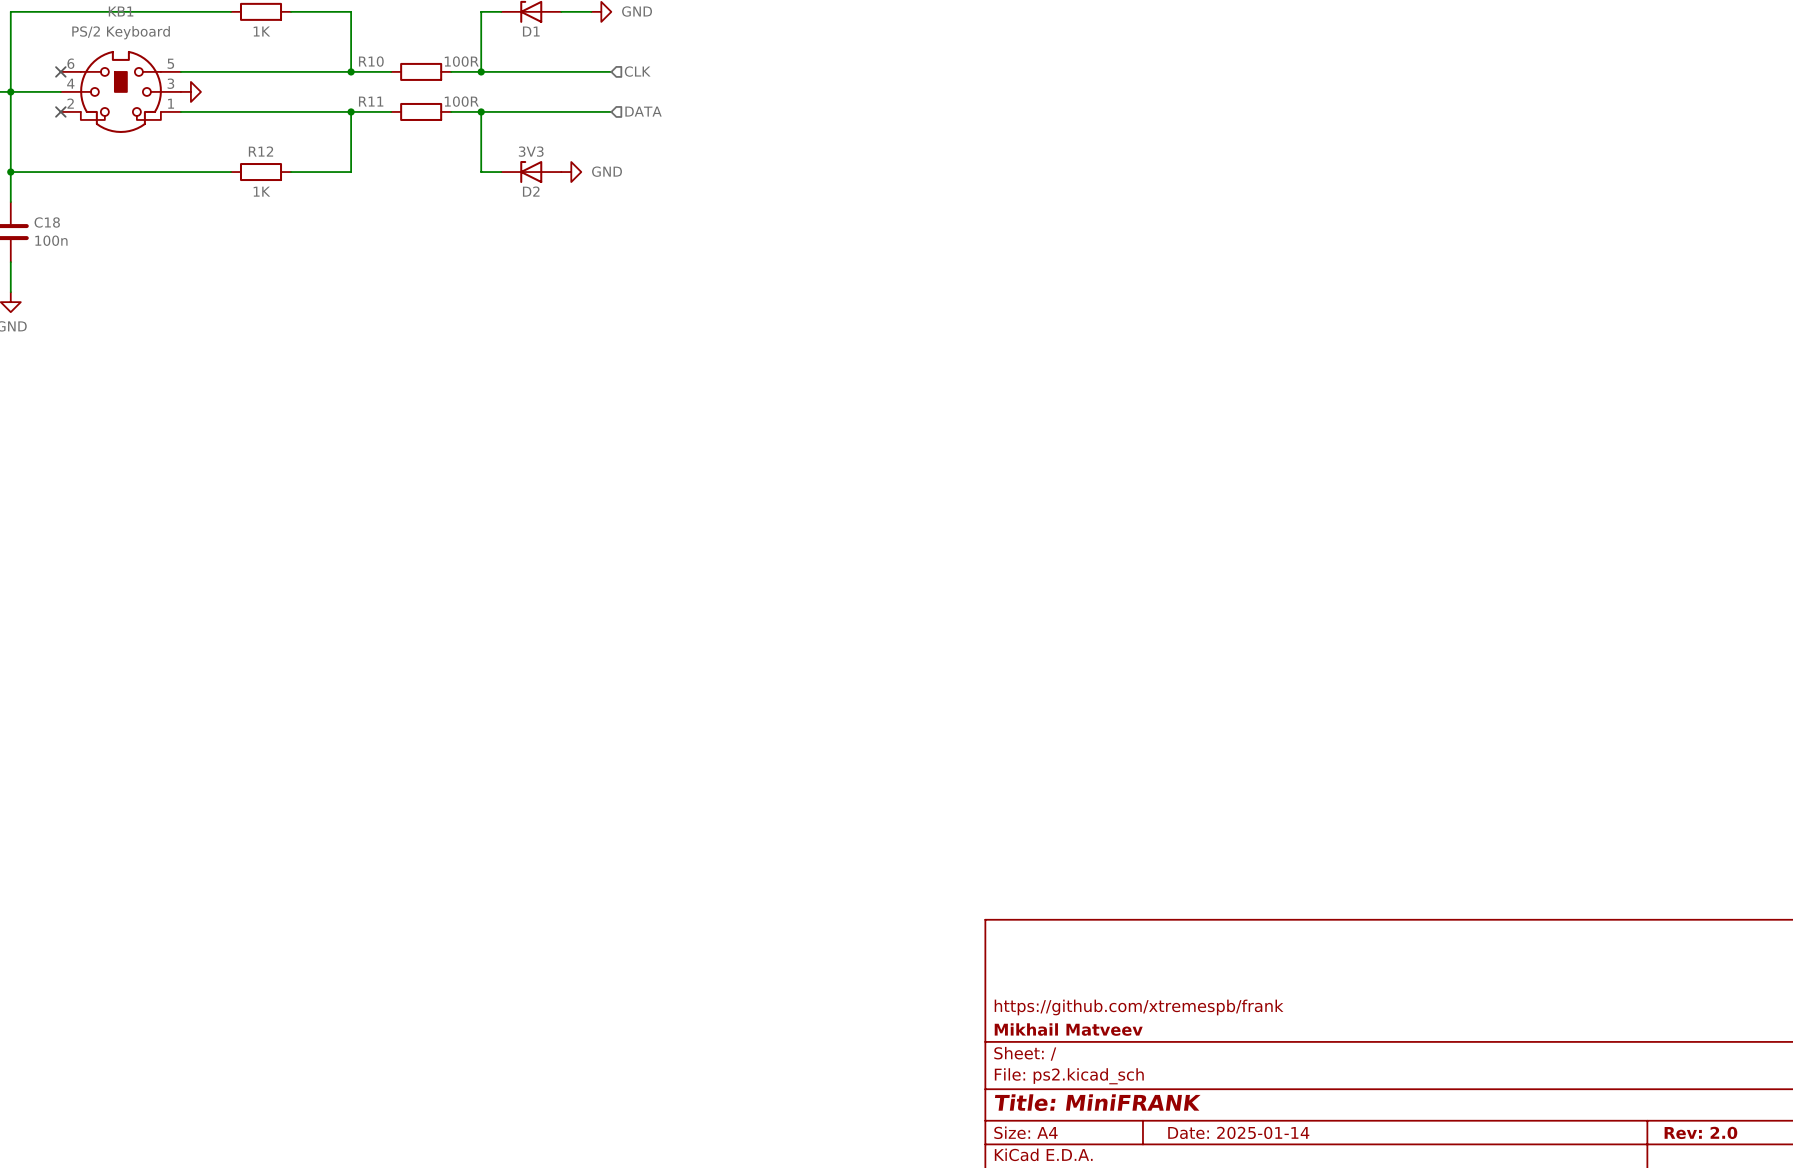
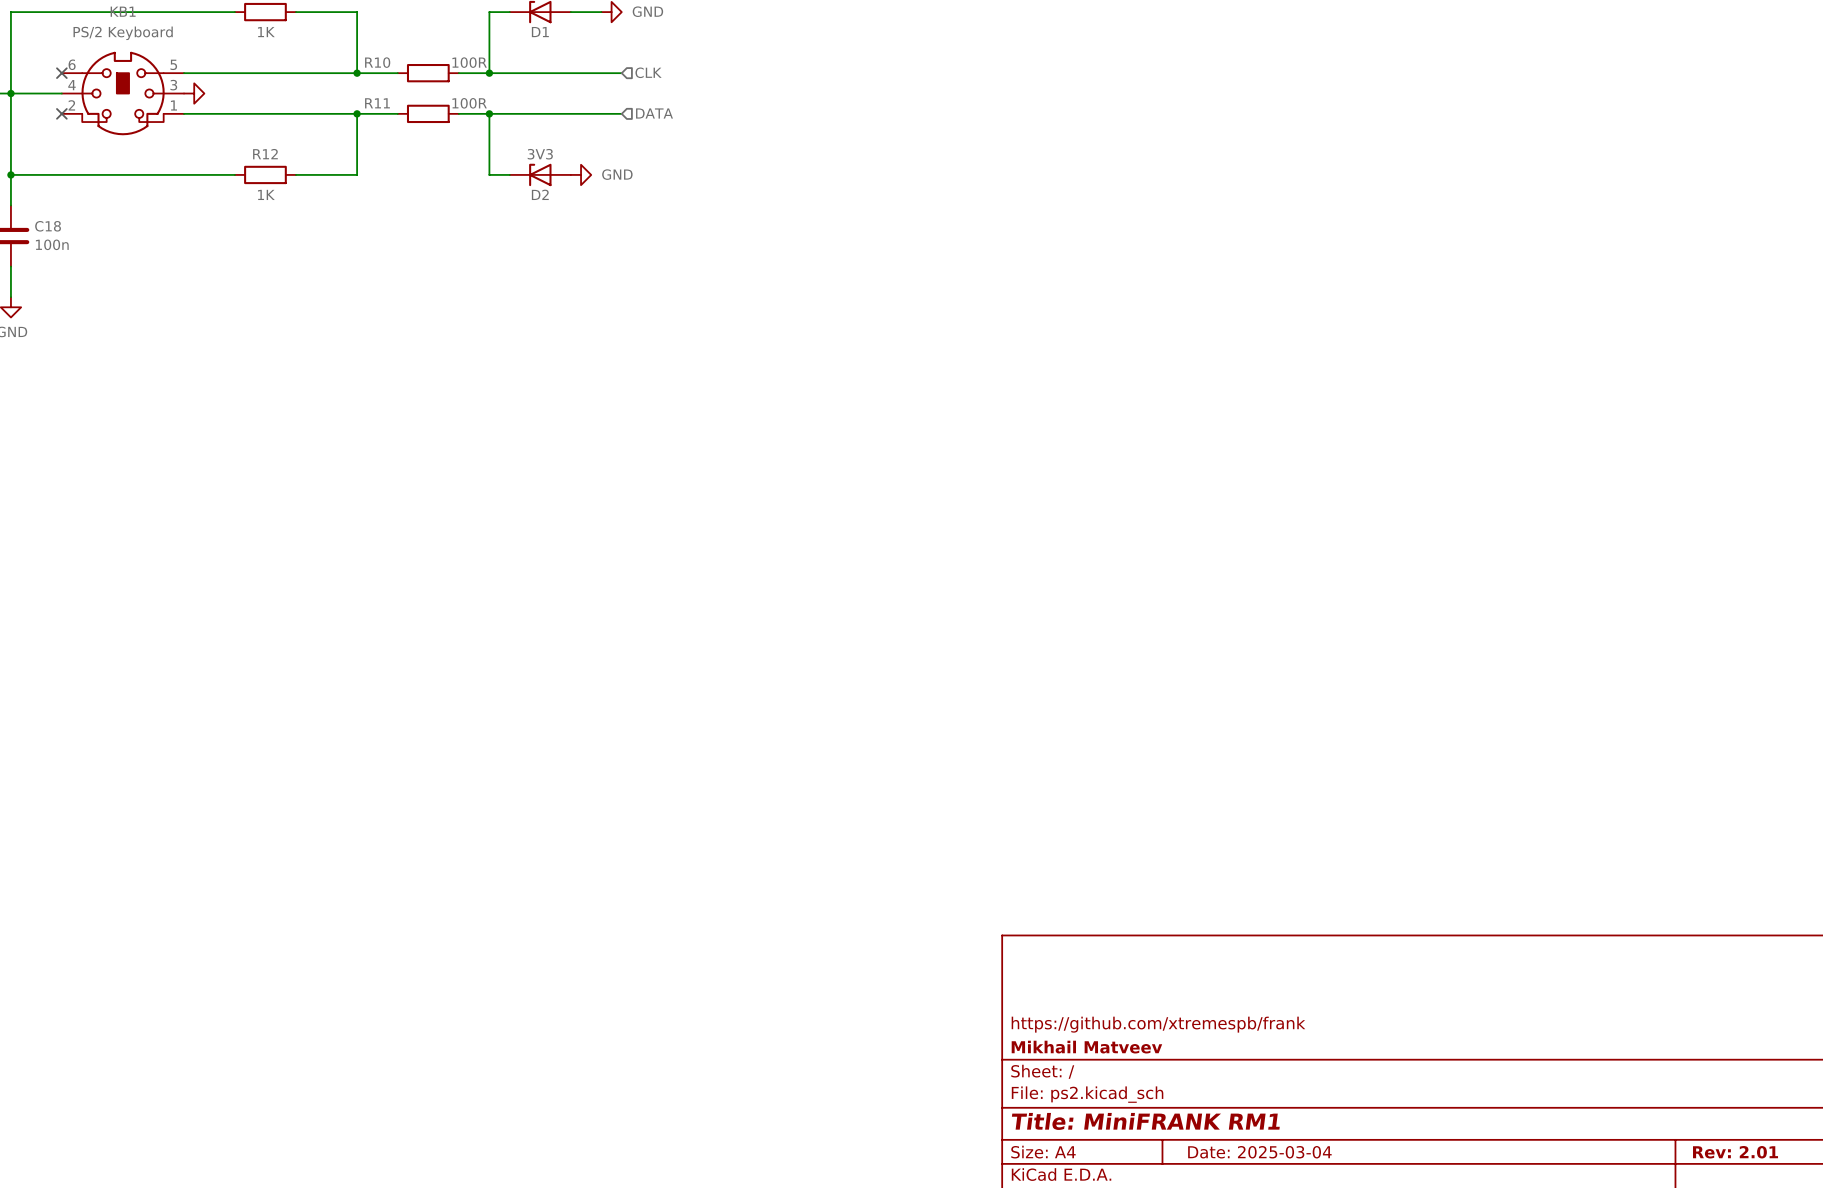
title block: Title: MiniFRANK (1097, 1102) -> Title: MiniFRANK RM1 (1145, 1121)
title block: Date: 2025-01-14 (1238, 1132) -> Date: 2025-03-04 (1259, 1152)
title block: Rev: 2.0 (1700, 1132) -> Rev: 2.01 (1735, 1152)

